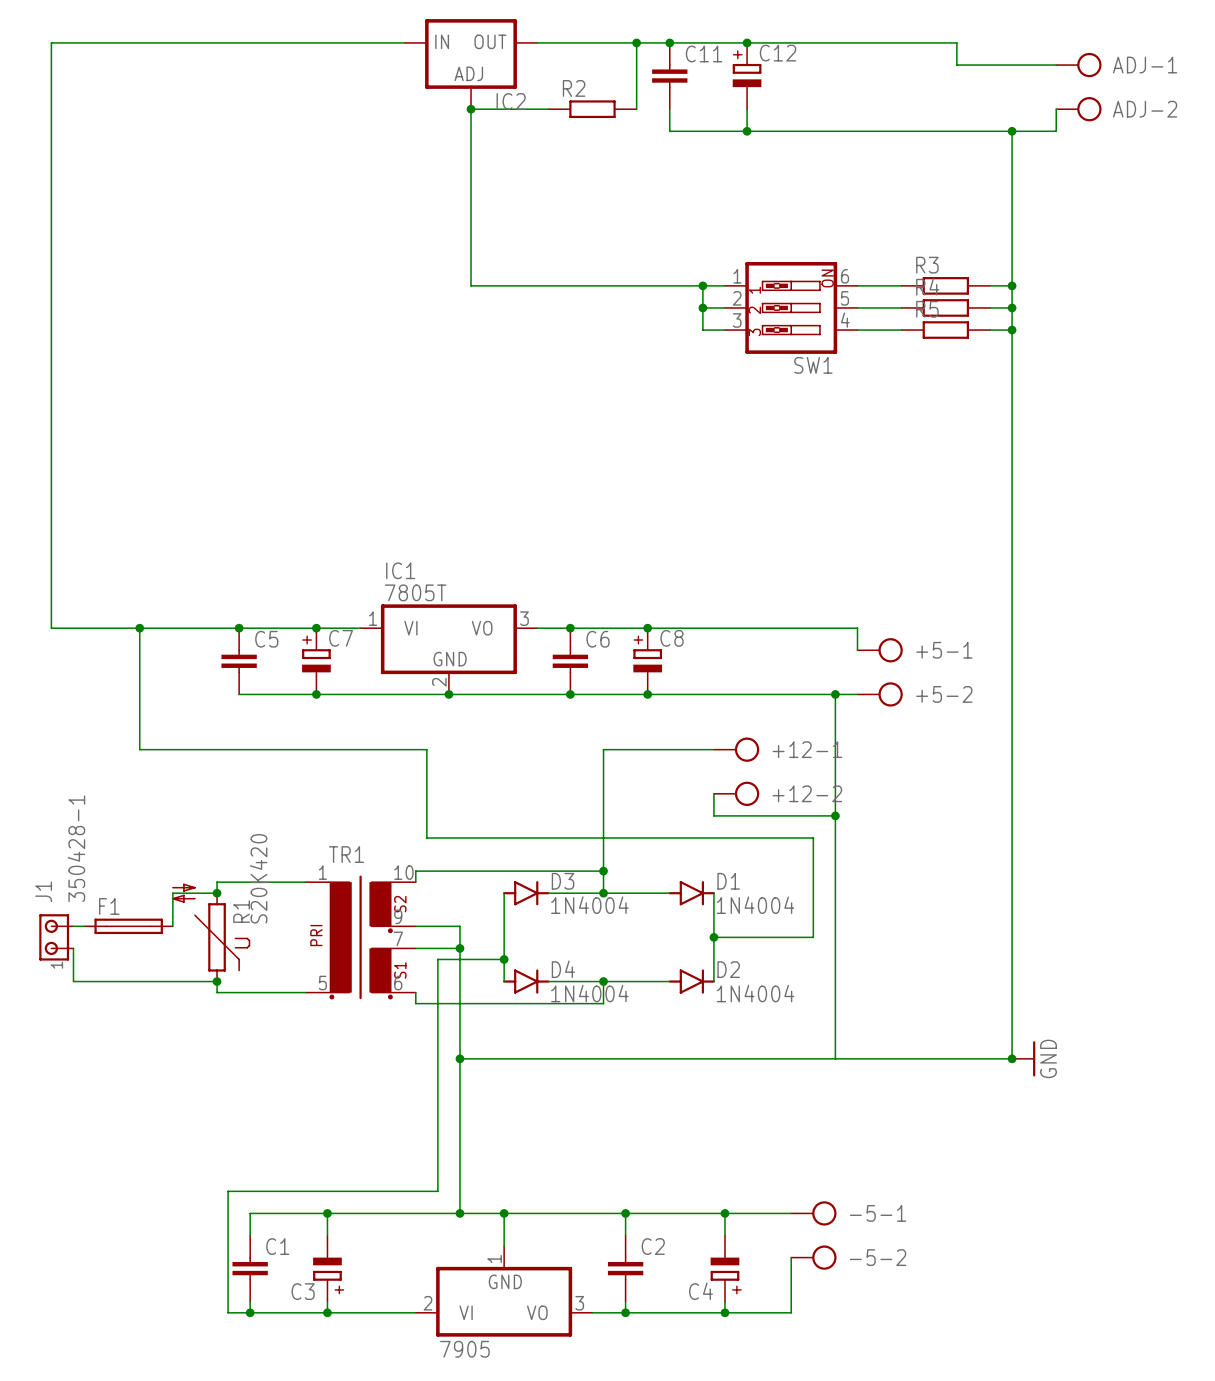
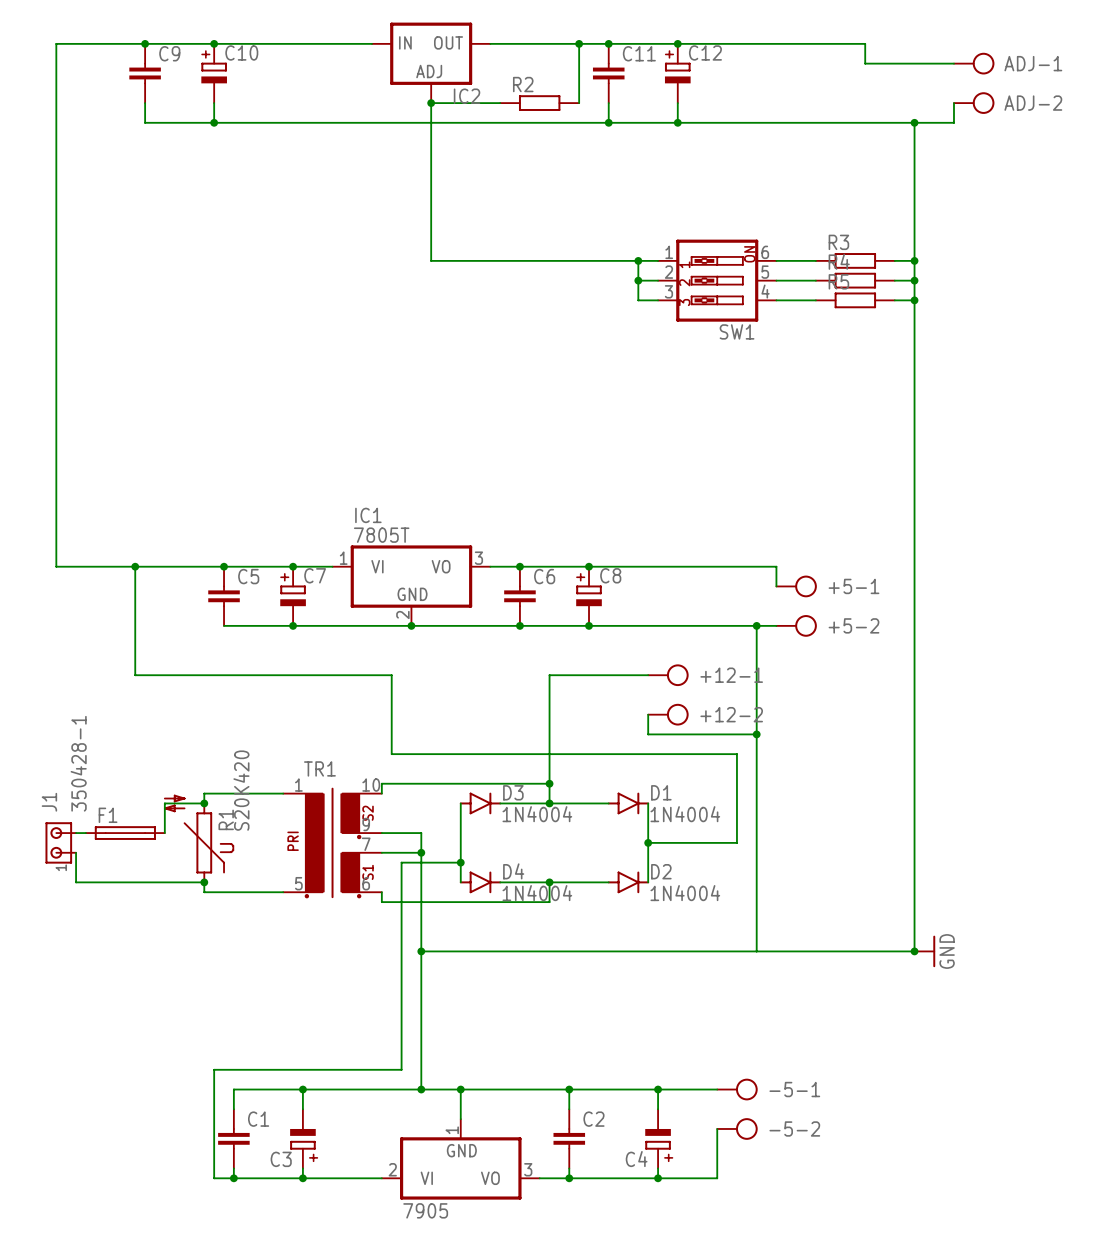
junction: none -> (145, 43)
junction: none -> (214, 43)
C9: none -> (145, 73)
C10: none -> (214, 73)
wire: none -> (145, 103) (145, 122) (608, 122)
wire: none -> (214, 103) (214, 122)
junction: none -> (214, 122)
junction: none -> (608, 122)

